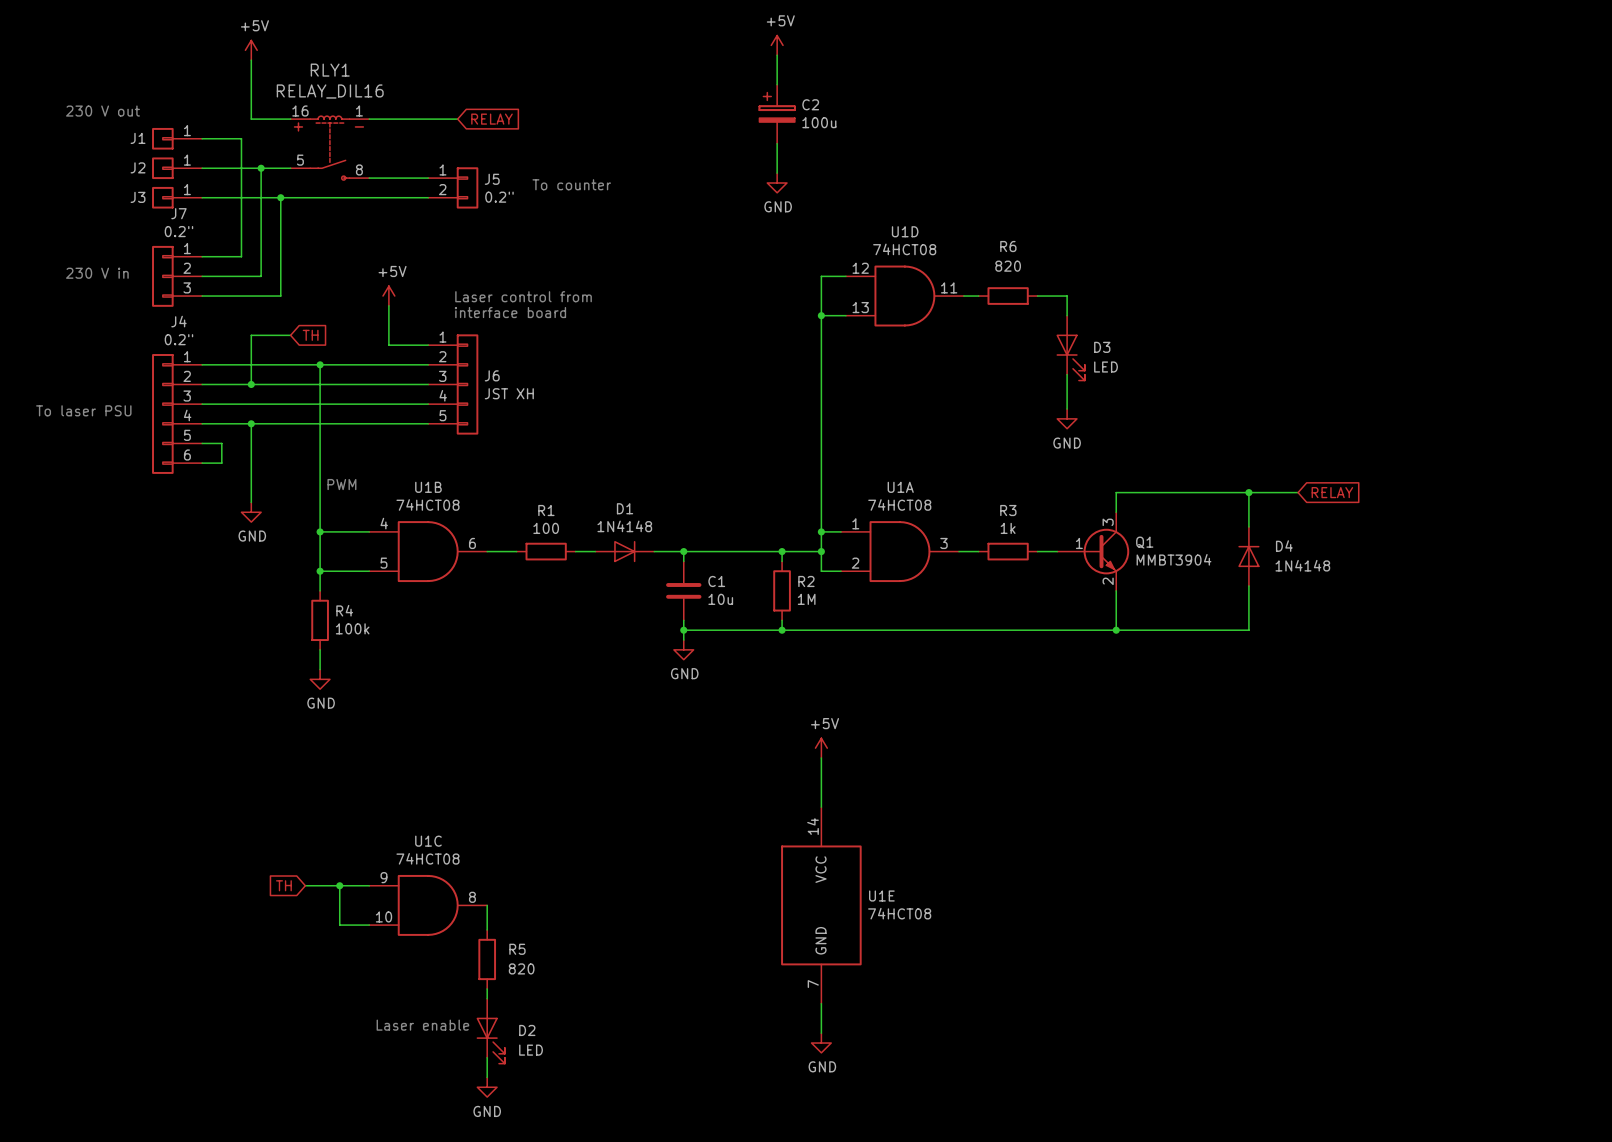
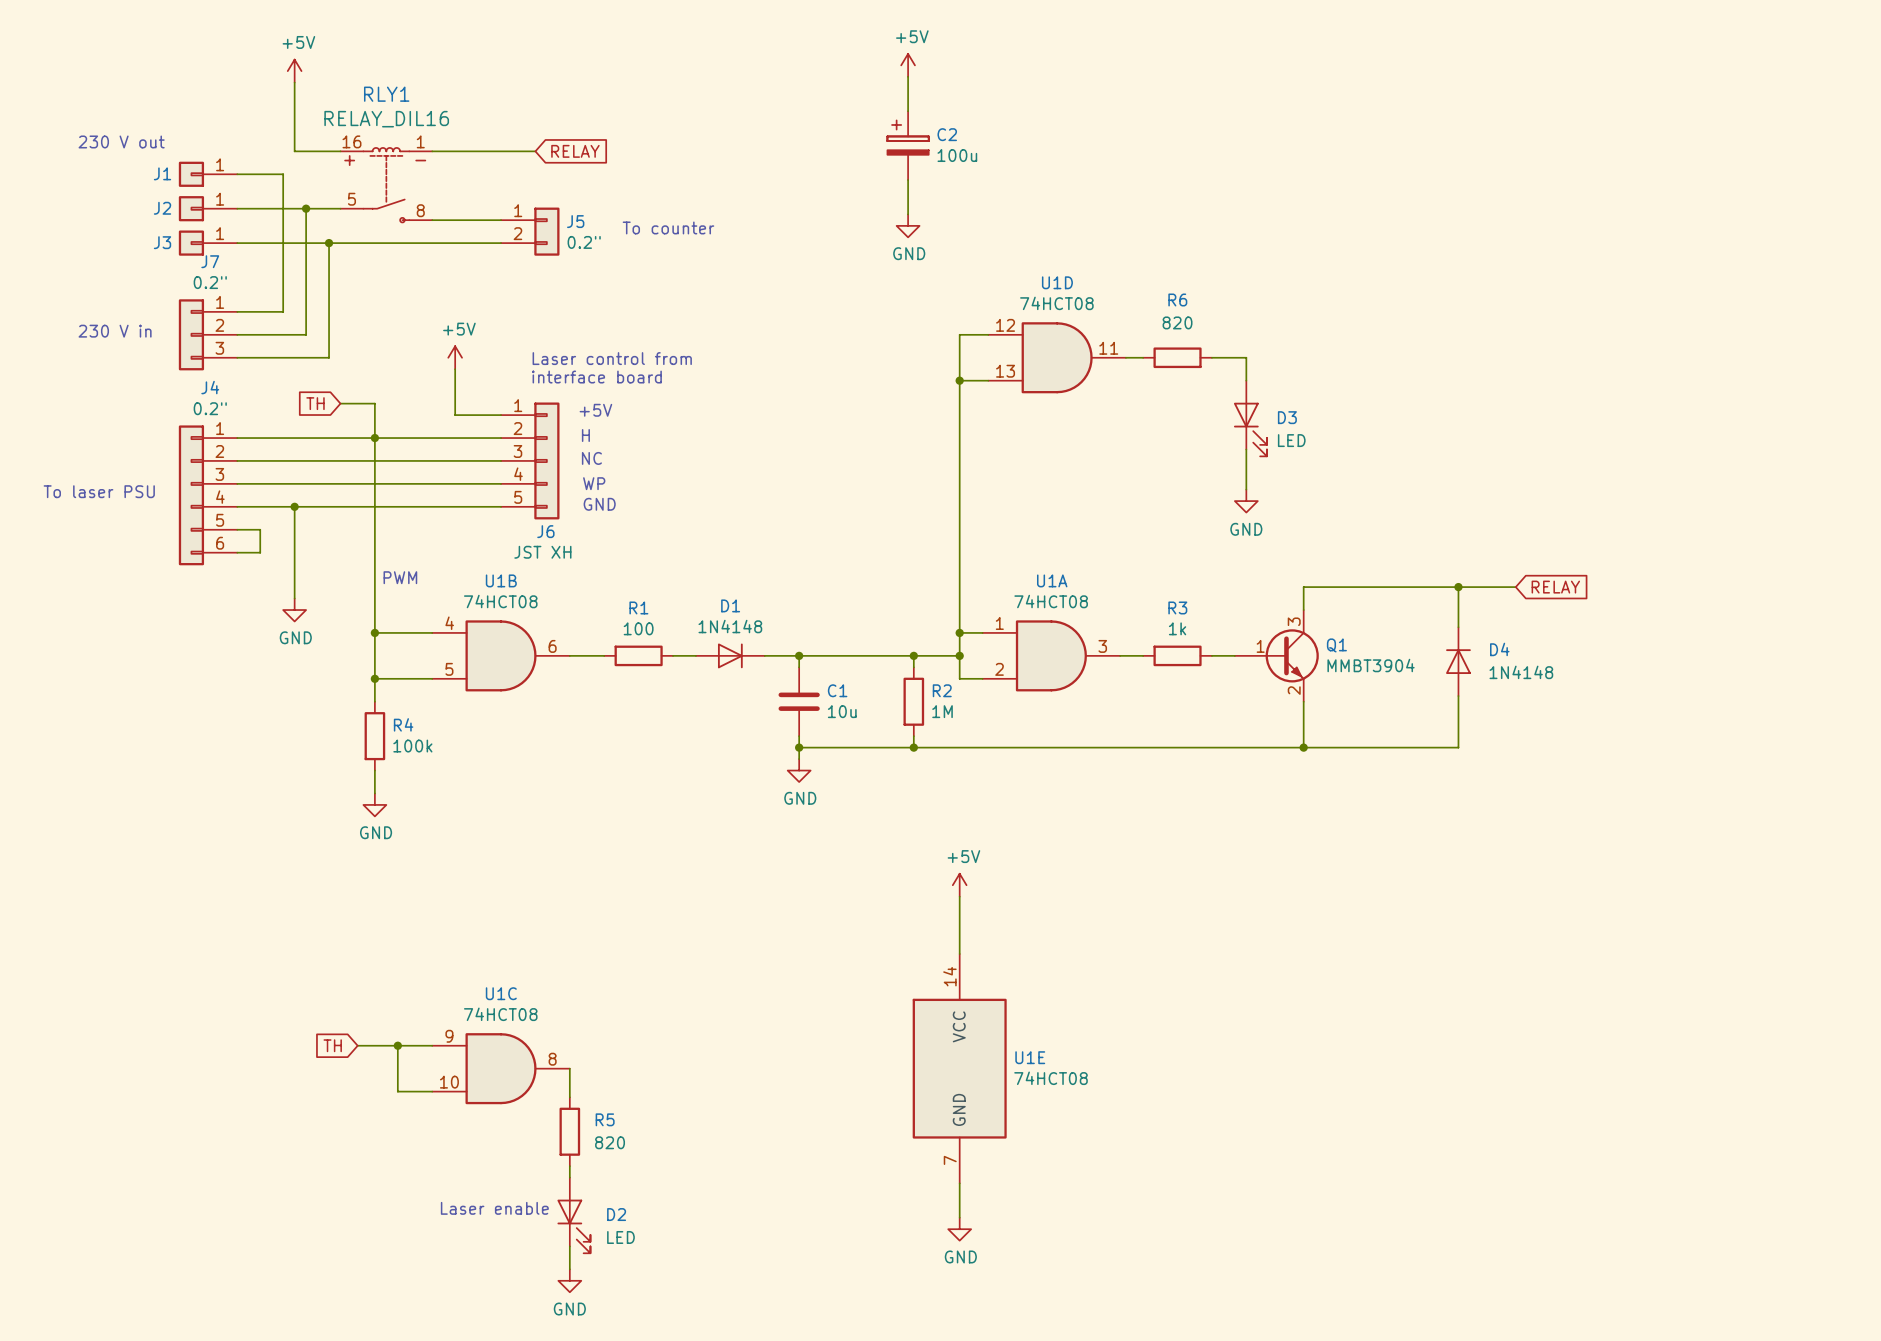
wire: (290, 335) (251, 335) (251, 384) -> (340, 403) (374, 403) (374, 438)
global label rotation: 0° (310, 335) -> 180° (315, 403)
text: none -> +5V (595, 410)
text: none -> H (585, 435)
J6 name position: J6 (492, 375) -> J6 (545, 531)
text: none -> NC (591, 458)
junction: (251, 384) -> none
J6 value position: JST XH (509, 393) -> JST XH (542, 552)
text: none -> WP (594, 483)
text: none -> GND (599, 504)

